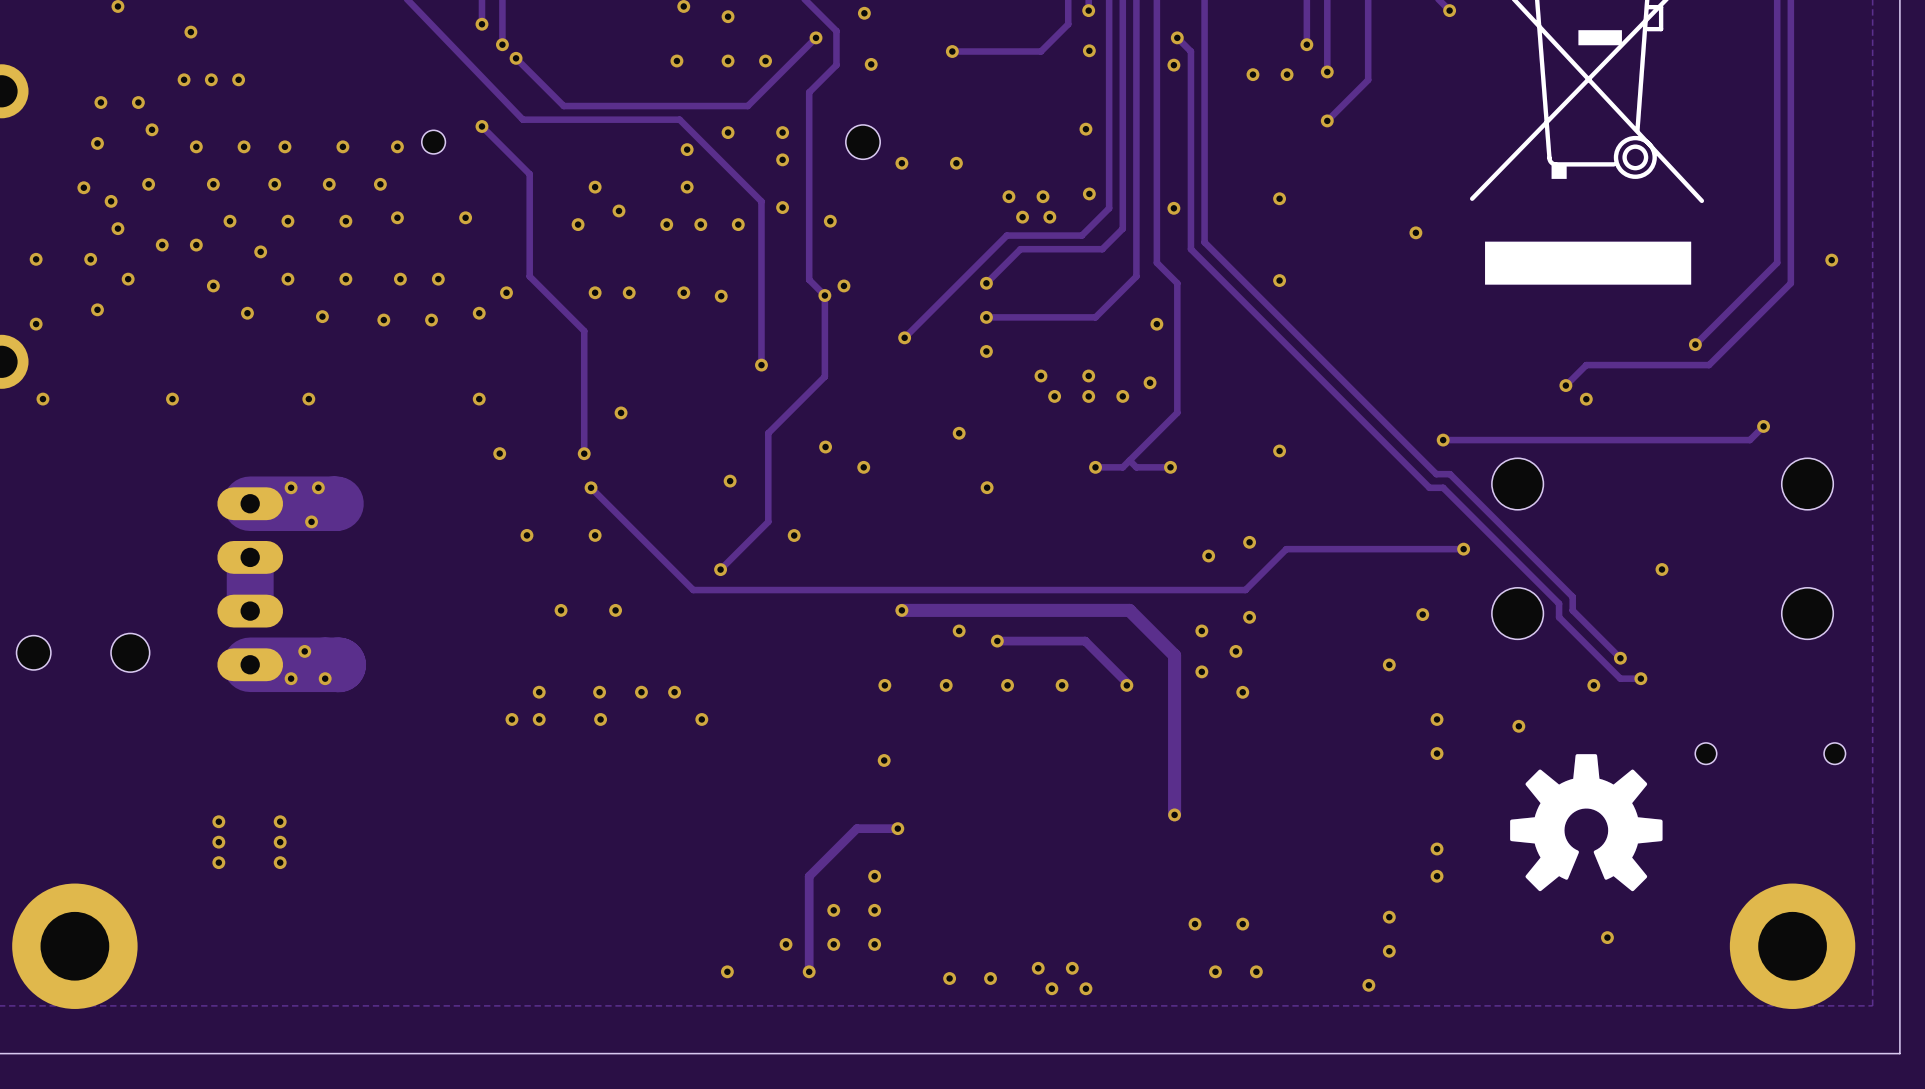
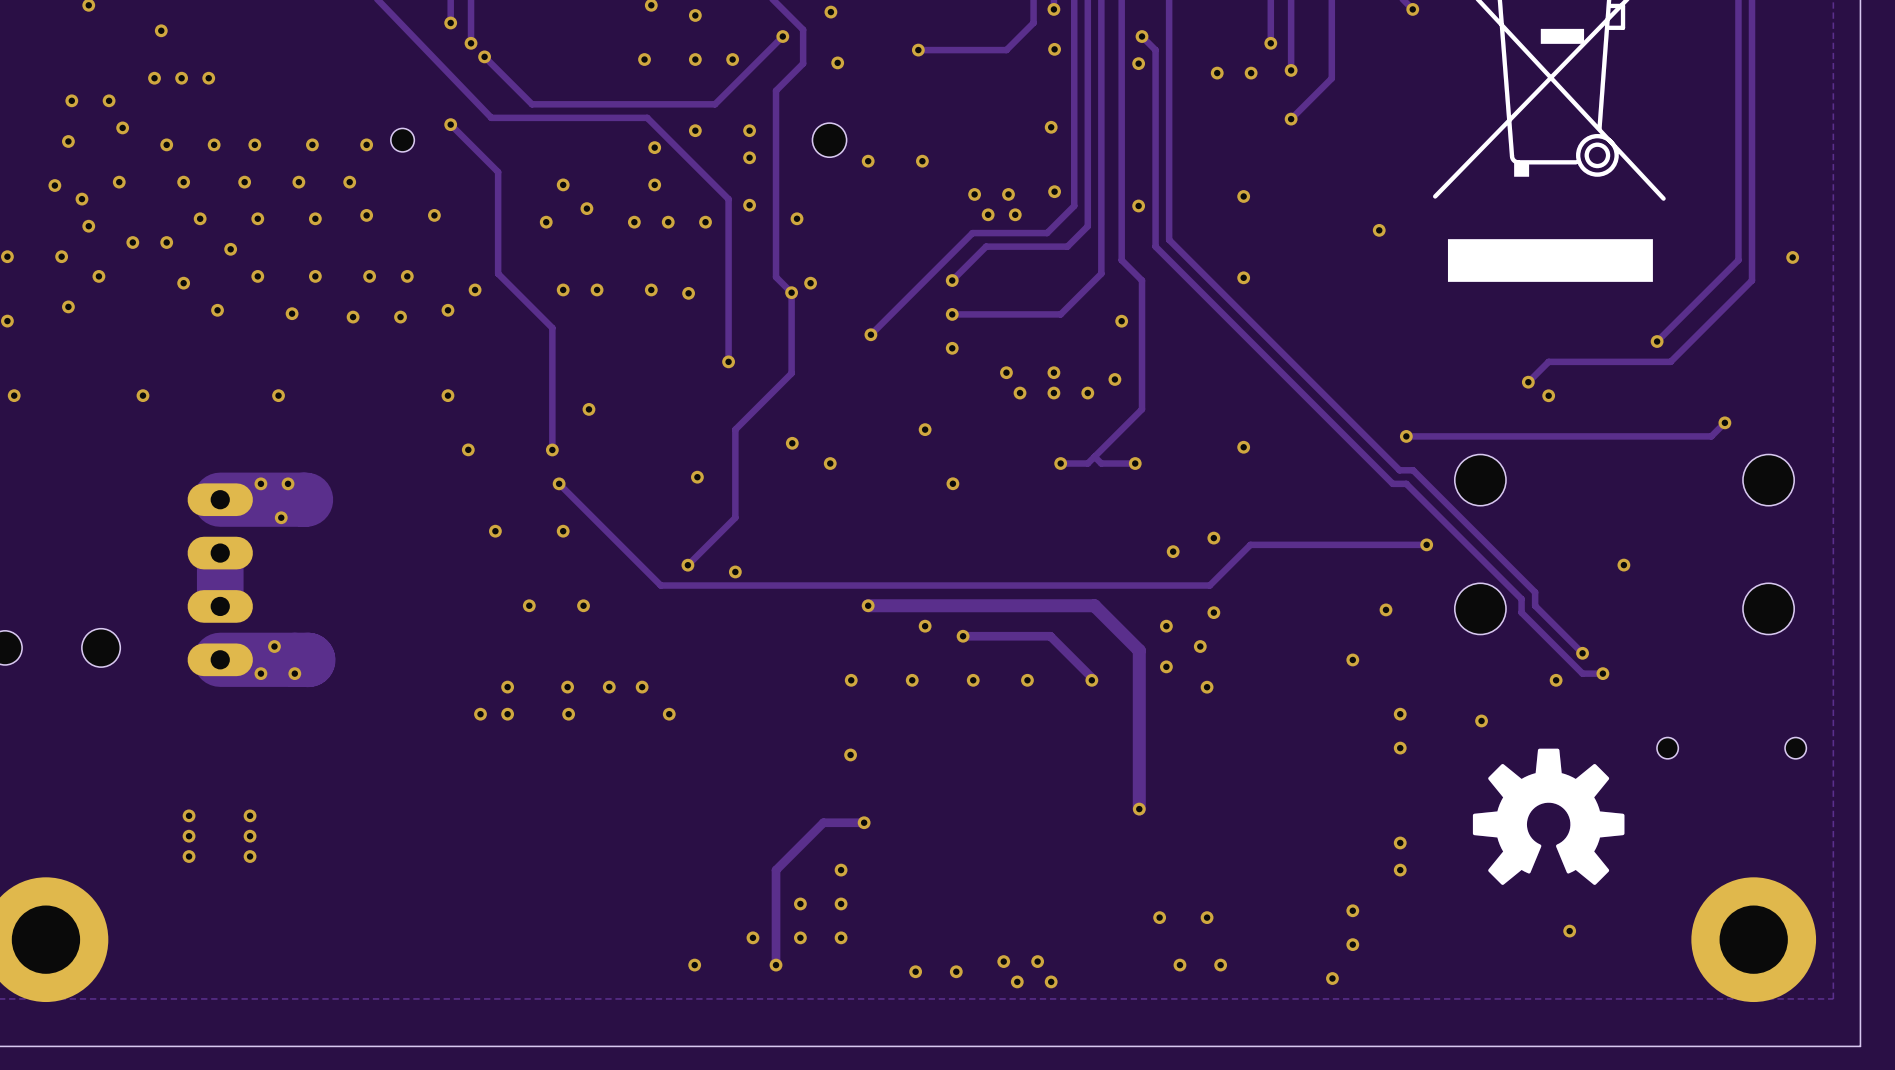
via position: (794, 535) -> (735, 571)

